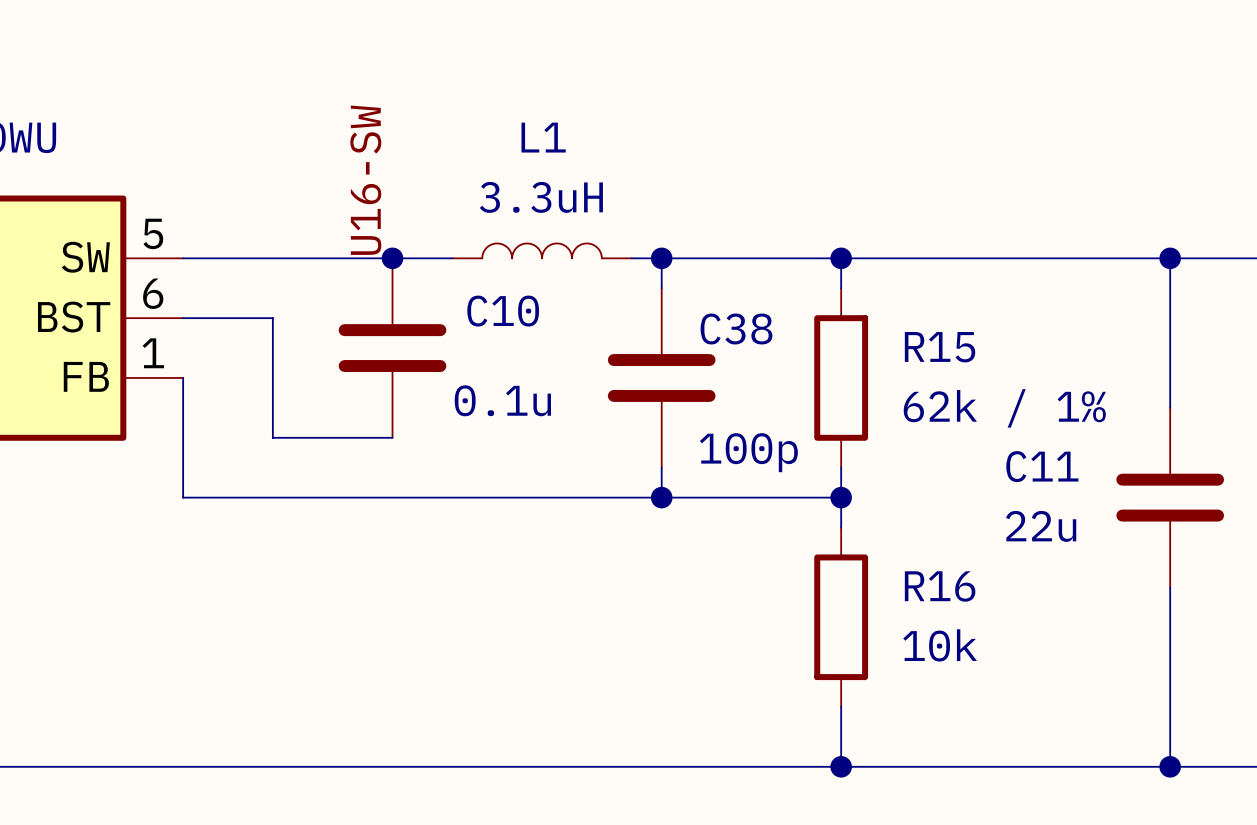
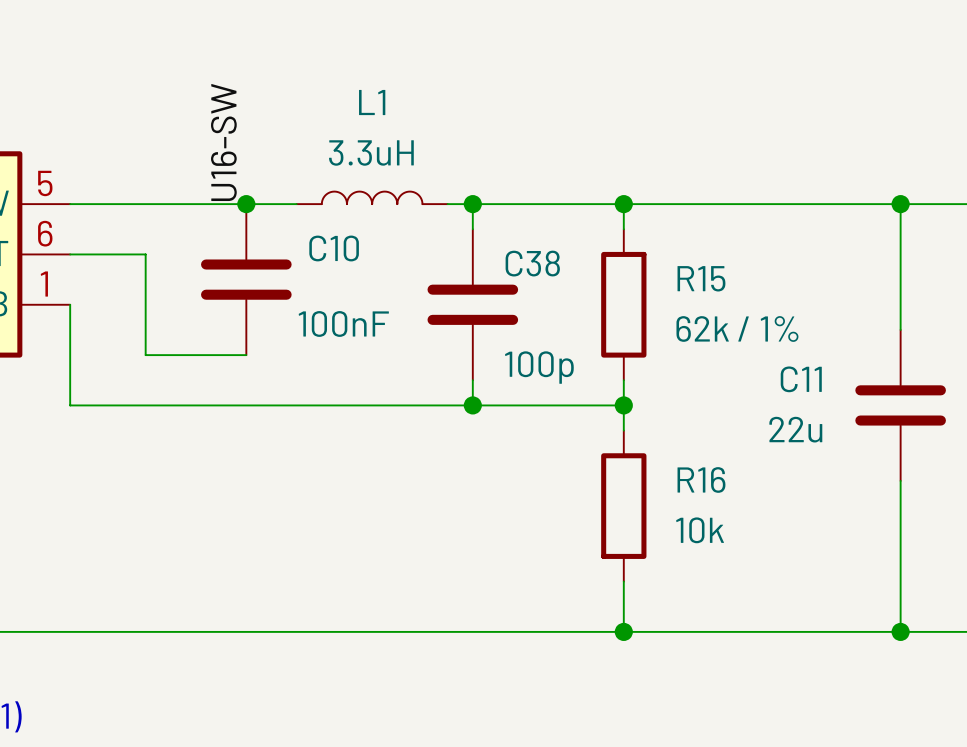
C10 value: 0.1u (502, 400) -> 100nF (343, 323)

